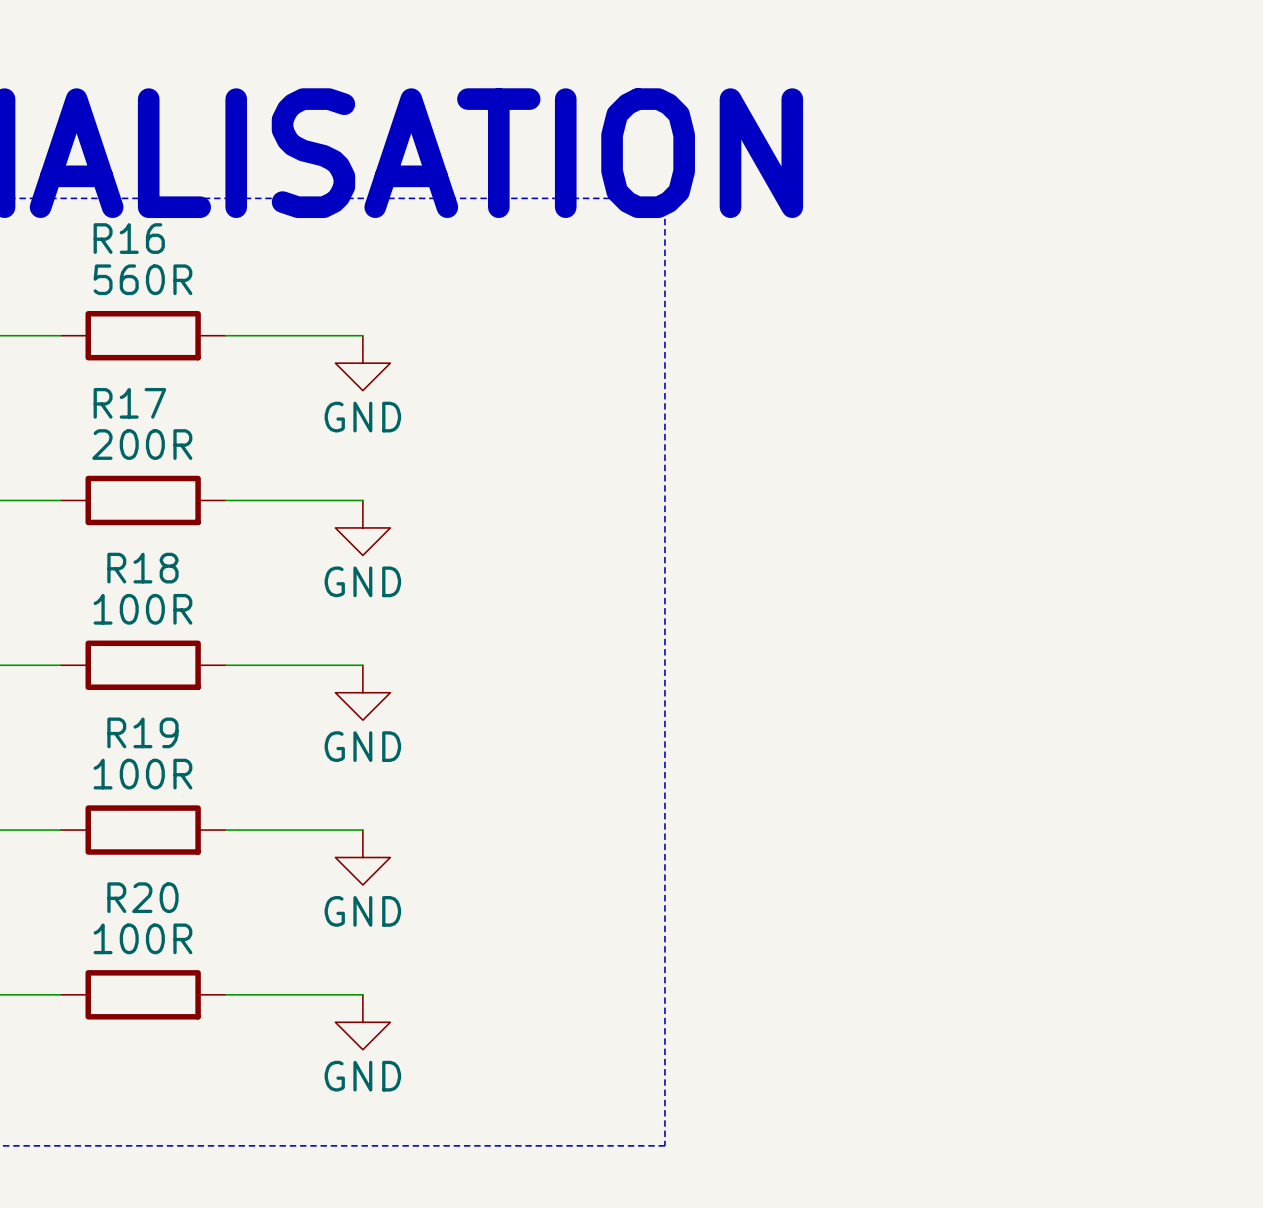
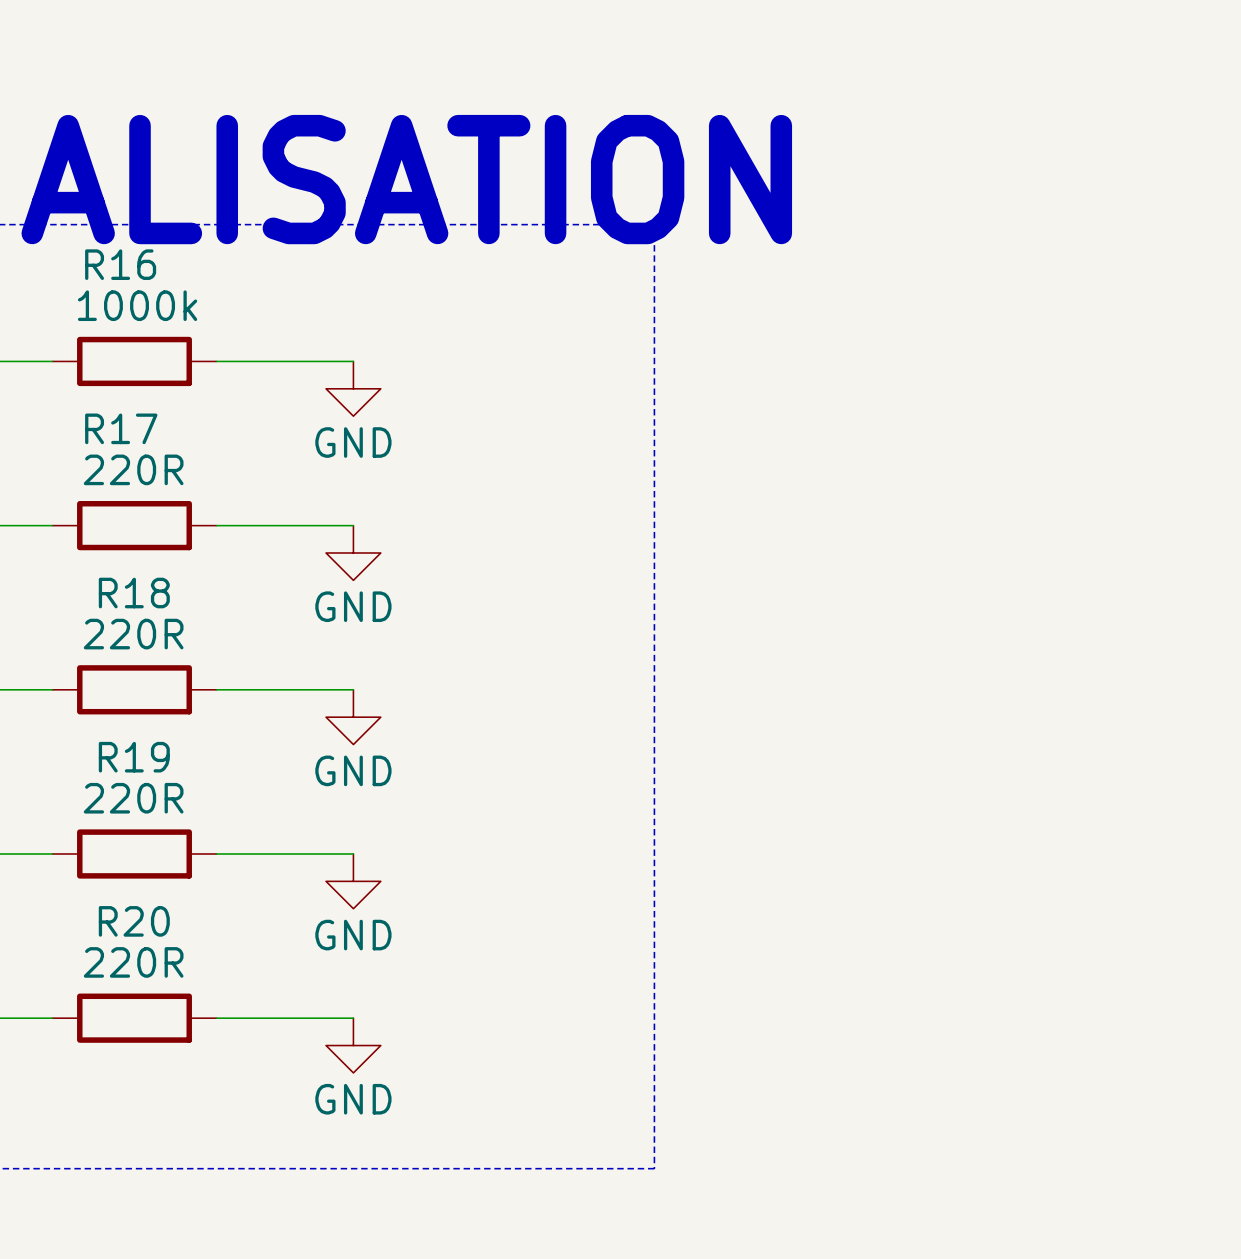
R16 value: 560R (142, 279) -> 1000k (137, 305)
R17 value: 200R (142, 444) -> 220R (133, 469)
R18 value: 100R (142, 609) -> 220R (133, 634)
R19 value: 100R (142, 774) -> 220R (133, 798)
R20 value: 100R (142, 938) -> 220R (133, 962)

